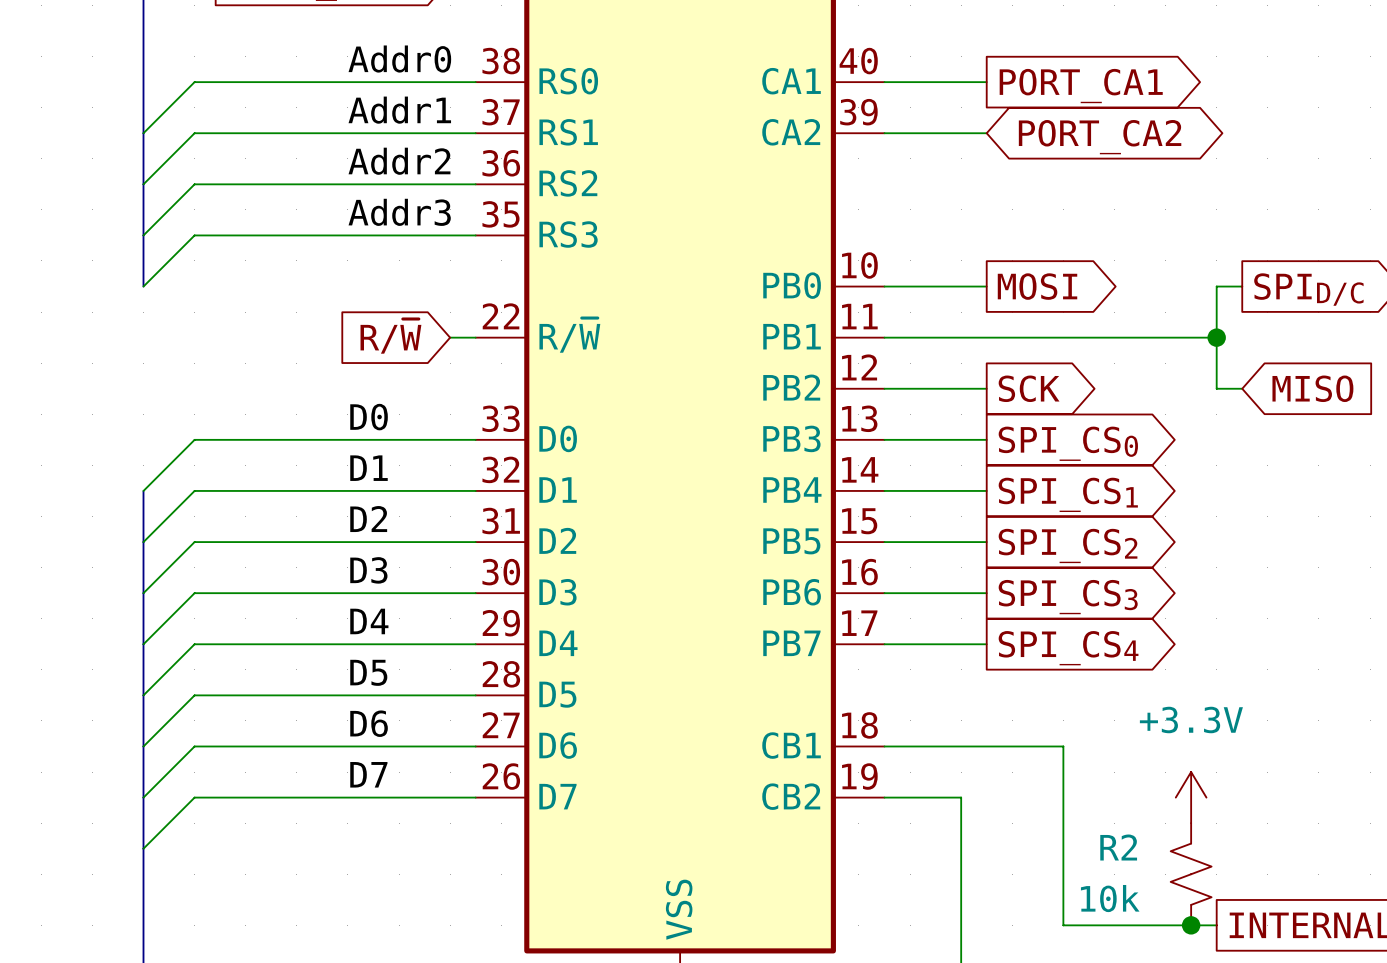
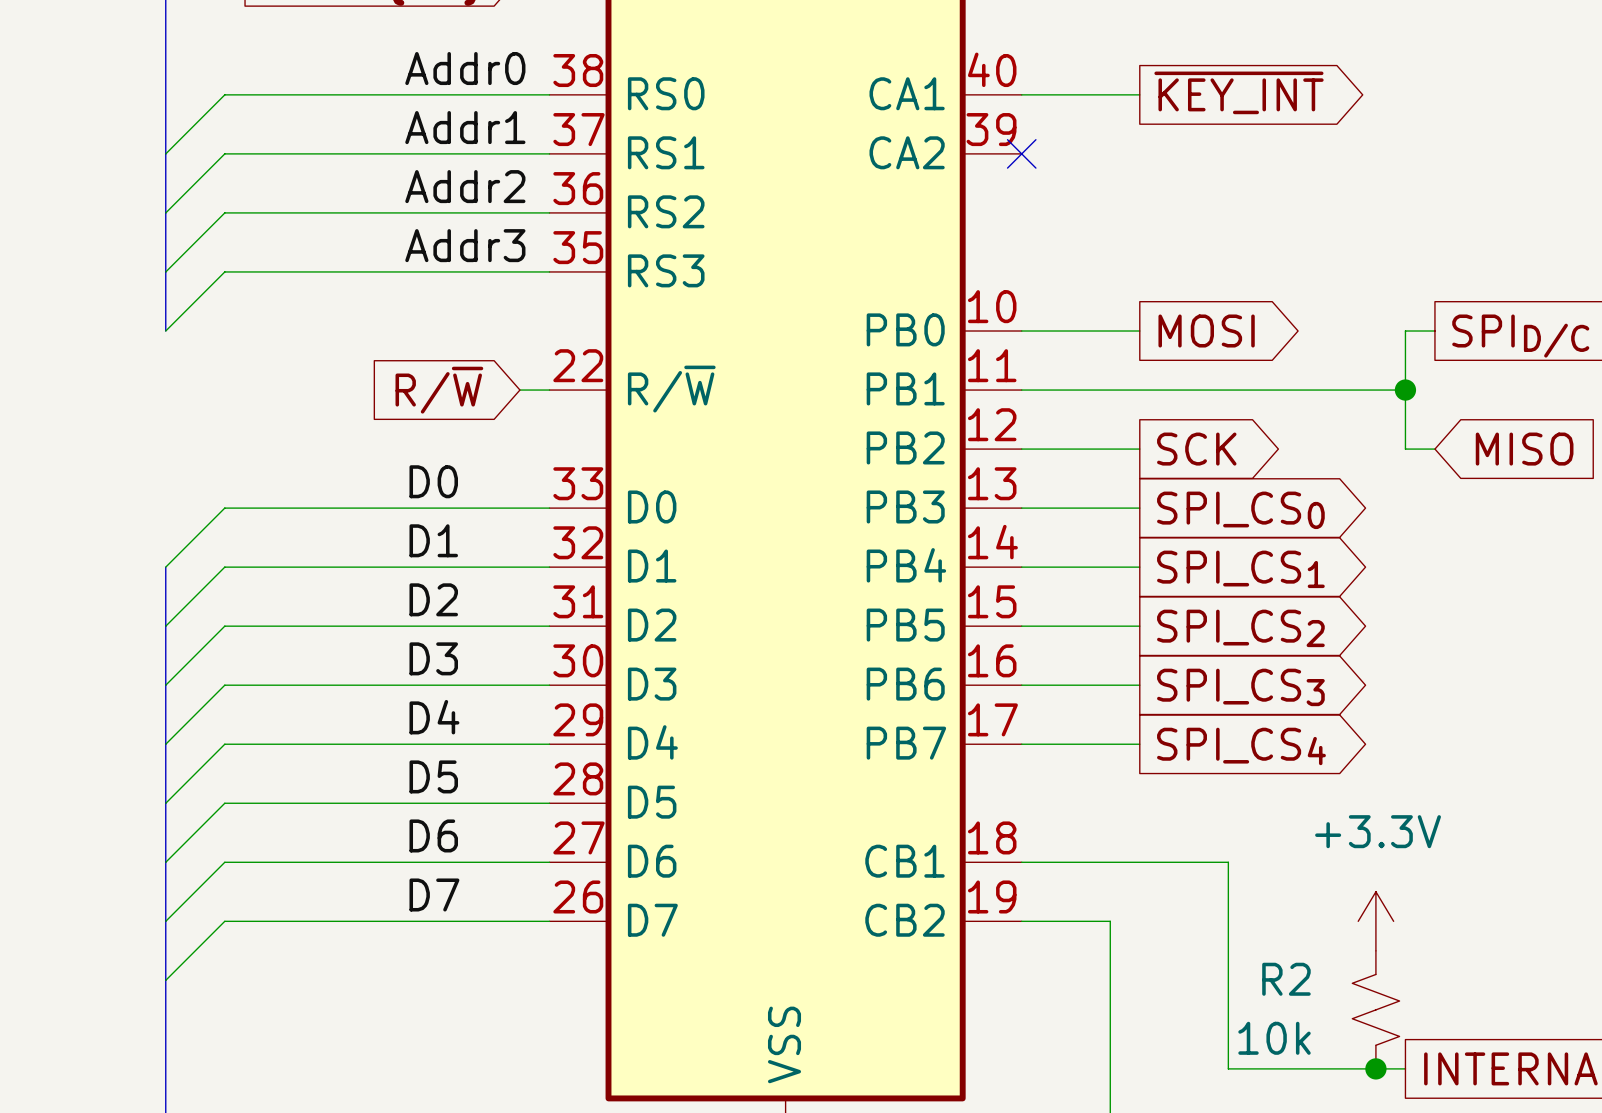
global label: PORT_CA1 (1081, 86) -> ~{KEY_INT} (1239, 92)
wire: (884, 133) (986, 133) -> none
no-connect mark: none -> (1021, 153)
global label: PORT_CA2 (1100, 137) -> none

